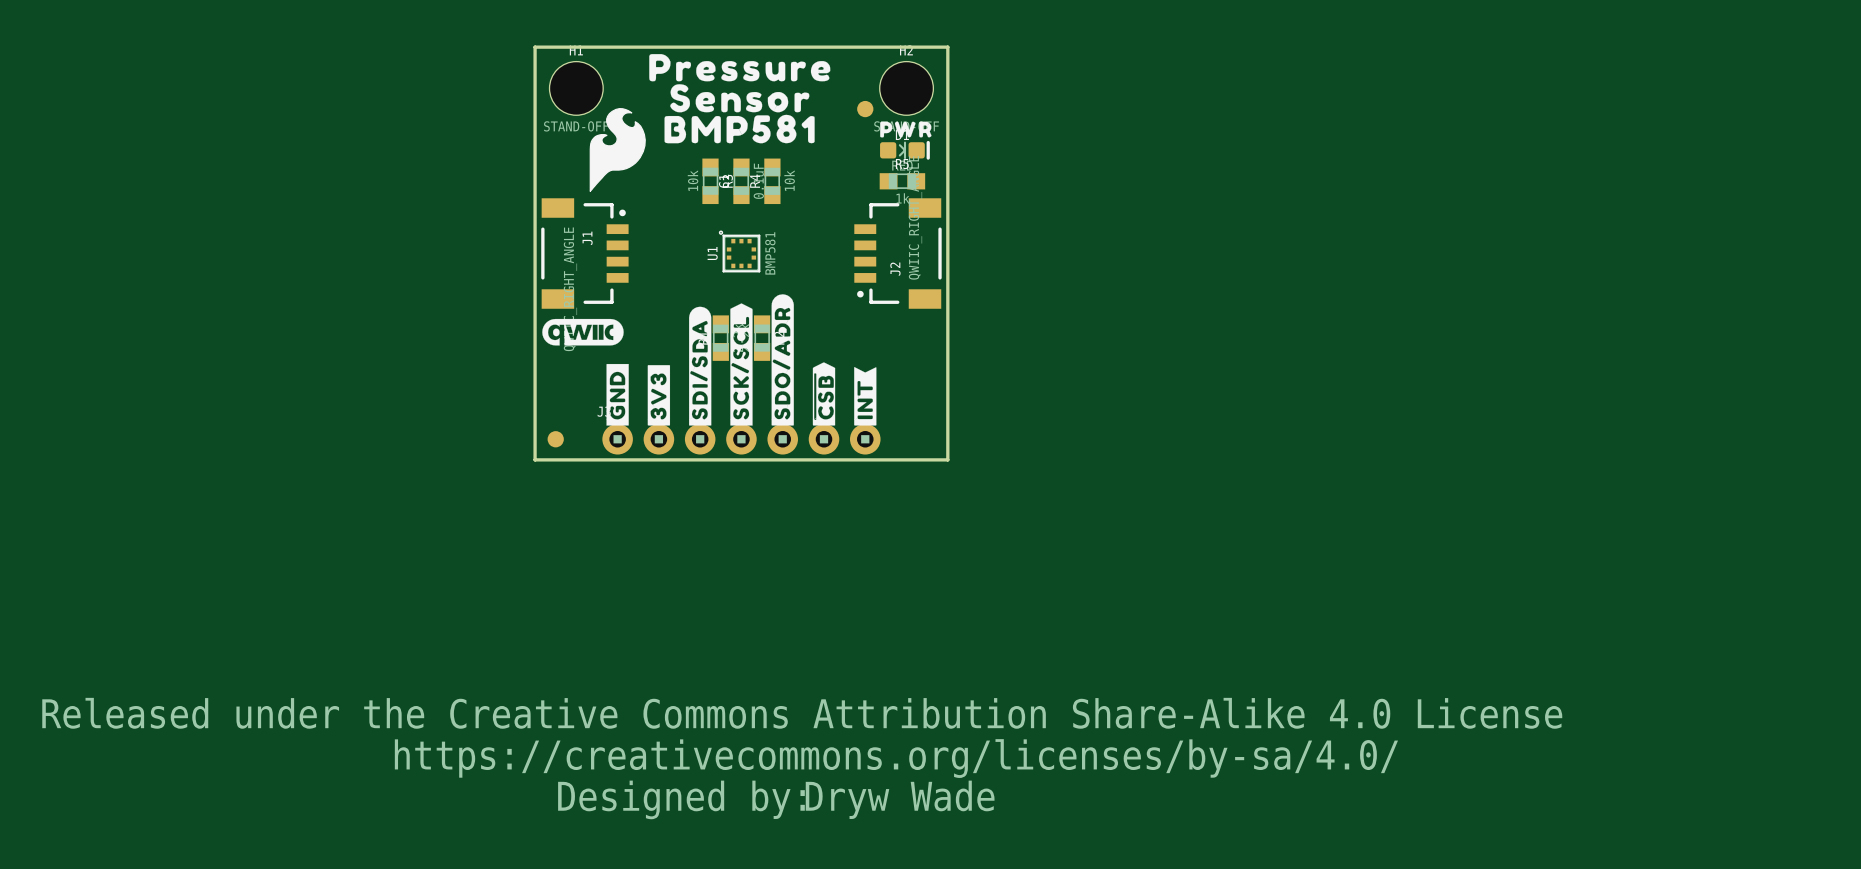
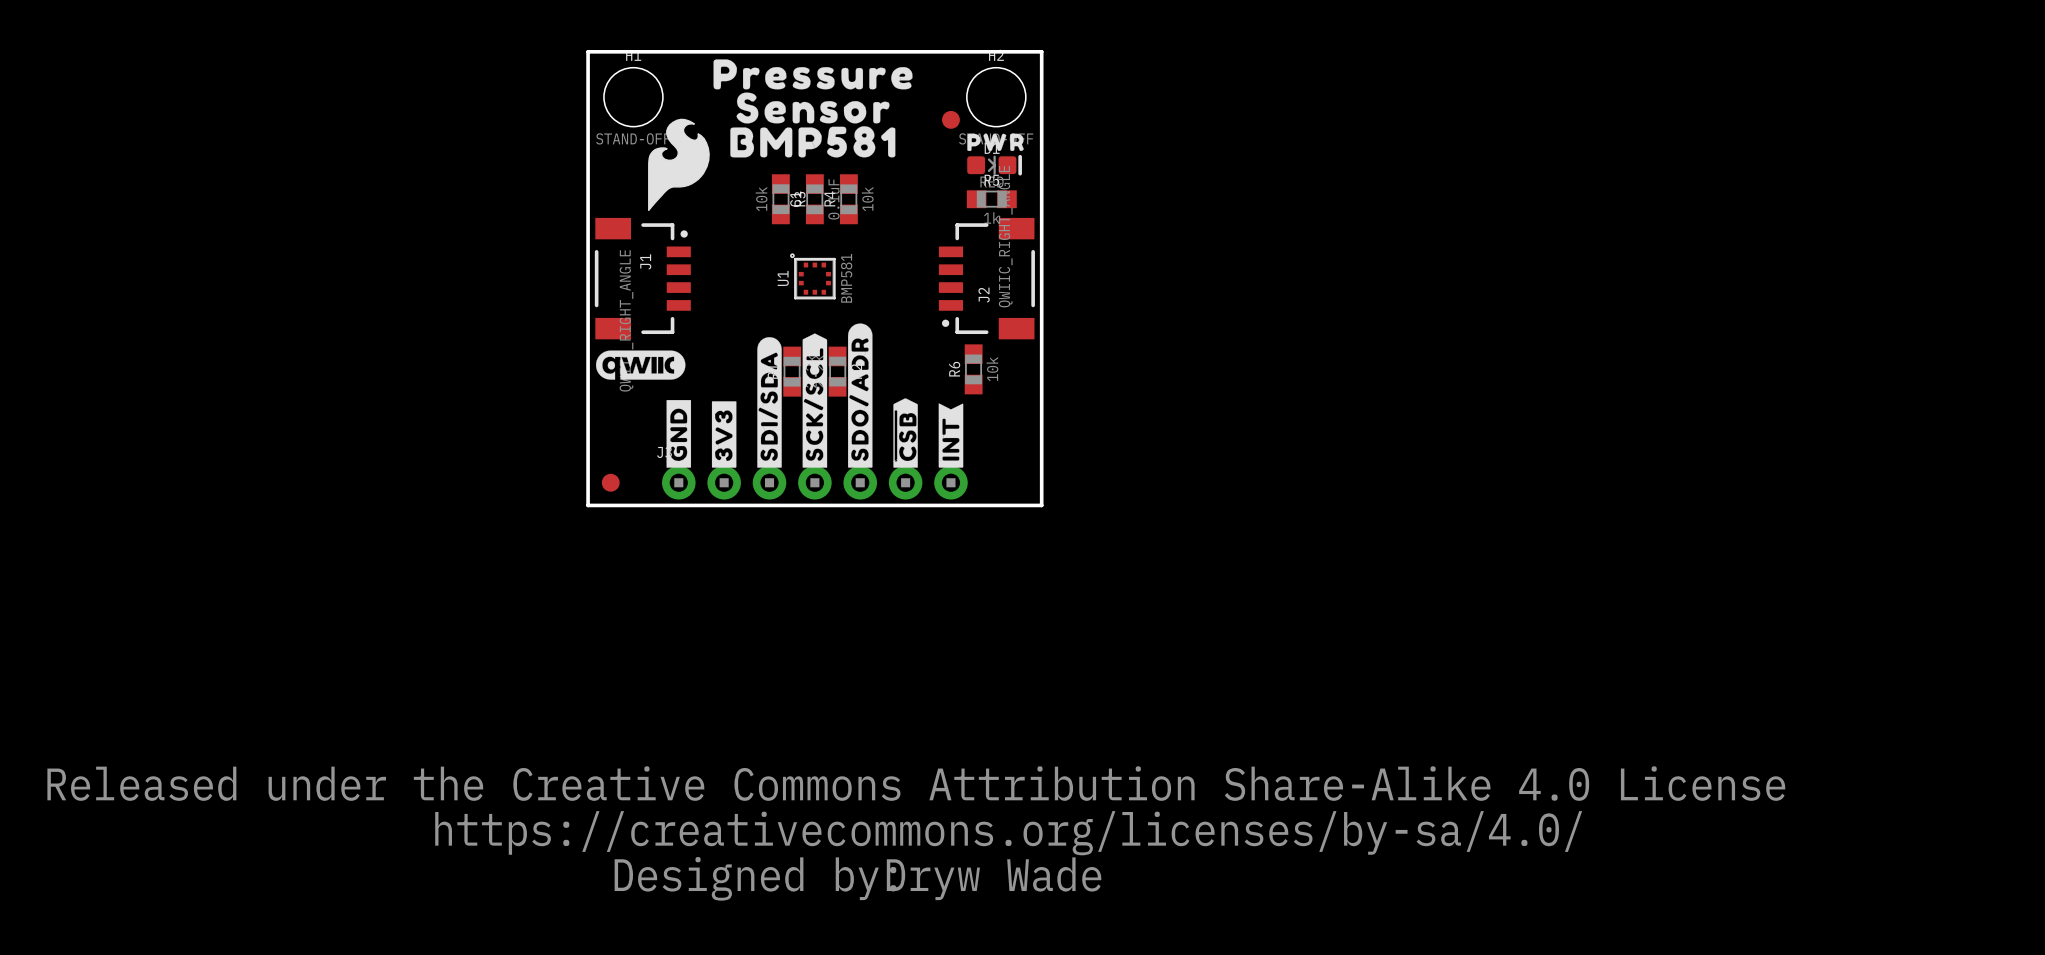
R6: none -> 10k (973, 369)

